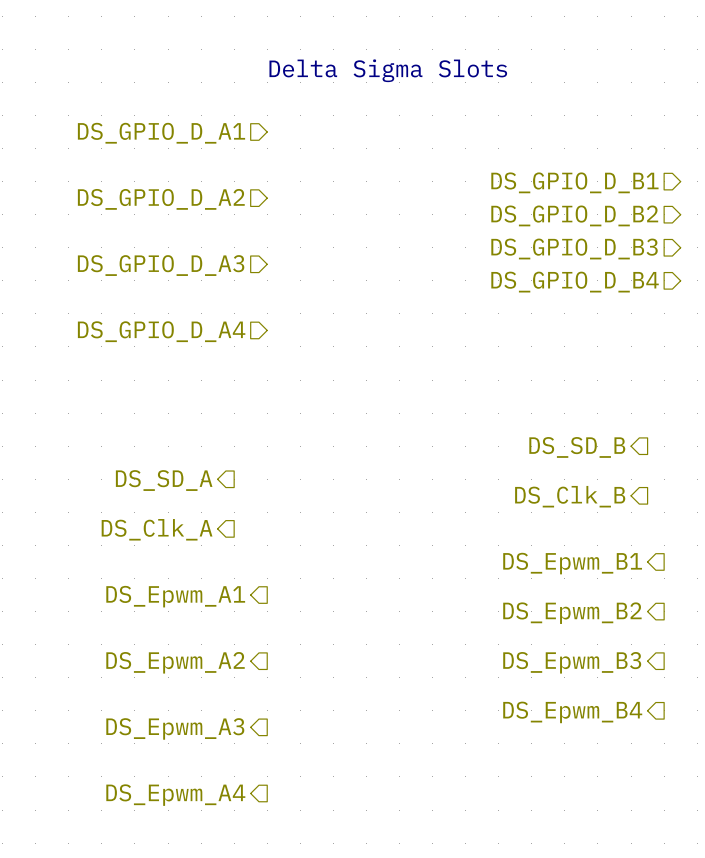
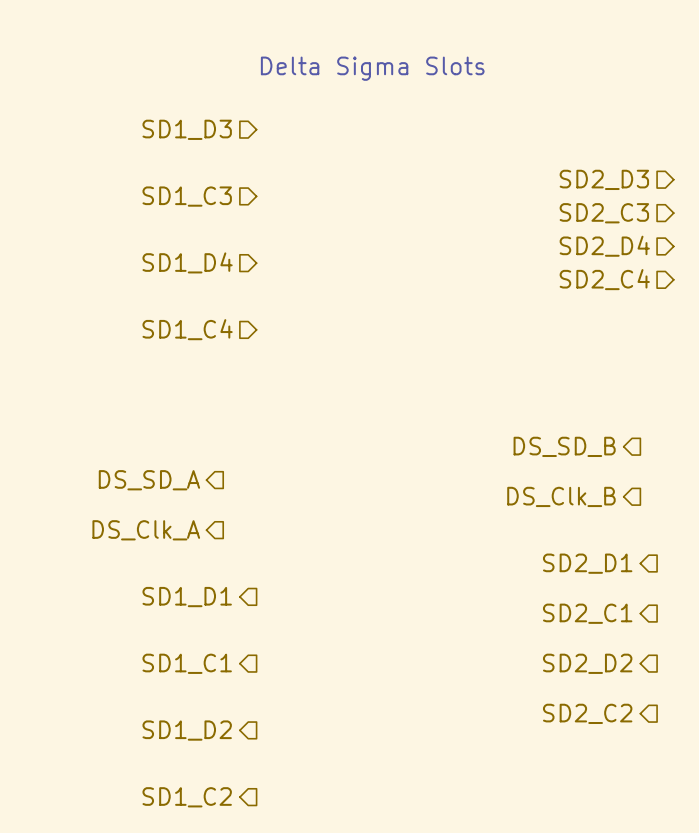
hierarchical label: DS_GPIO_D_A1 (161, 133) -> SD1_D3 (187, 129)
hierarchical label: DS_GPIO_D_B1 (574, 182) -> SD2_D3 (604, 179)
hierarchical label: DS_GPIO_D_A2 (161, 199) -> SD1_C3 (187, 196)
hierarchical label: DS_GPIO_D_B2 (574, 215) -> SD2_C3 (604, 213)
hierarchical label: DS_GPIO_D_B3 (574, 249) -> SD2_D4 (604, 246)
hierarchical label: DS_GPIO_D_A3 (161, 265) -> SD1_D4 (187, 262)
hierarchical label: DS_GPIO_D_B4 (575, 282) -> SD2_C4 (604, 279)
hierarchical label: DS_GPIO_D_A4 (161, 331) -> SD1_C4 (187, 329)
hierarchical label: DS_Epwm_B1 (572, 563) -> SD2_D1 (587, 563)
hierarchical label: DS_Epwm_A1 (175, 596) -> SD1_D1 (187, 597)
hierarchical label: DS_Epwm_B2 (572, 613) -> SD2_C1 (587, 613)
hierarchical label: DS_Epwm_A2 (175, 662) -> SD1_C1 (187, 663)
hierarchical label: DS_Epwm_B3 (572, 662) -> SD2_D2 (587, 663)
hierarchical label: DS_Epwm_B4 (572, 712) -> SD2_C2 (587, 713)
hierarchical label: DS_Epwm_A3 (175, 728) -> SD1_D2 (187, 730)
hierarchical label: DS_Epwm_A4 (175, 795) -> SD1_C2 (187, 797)

